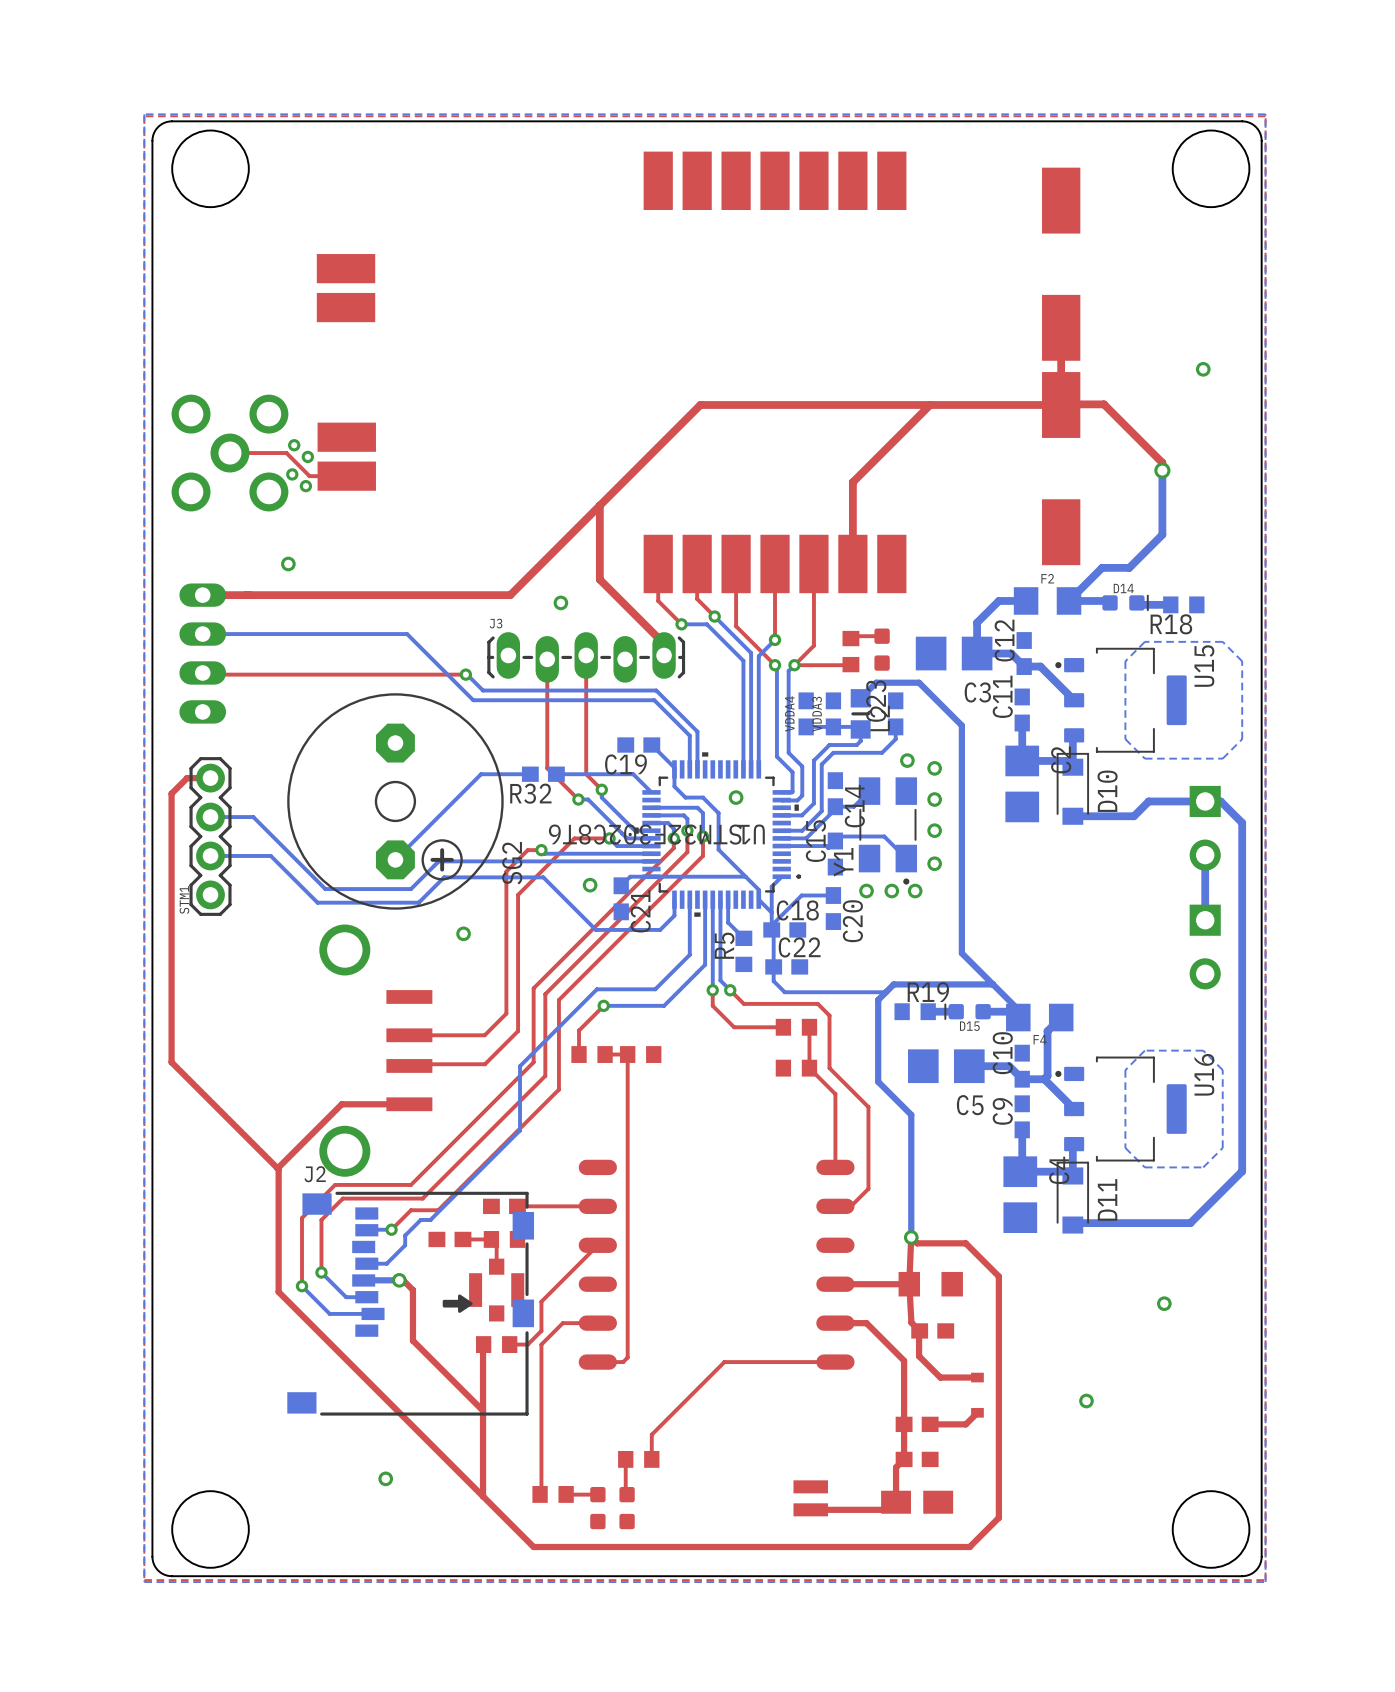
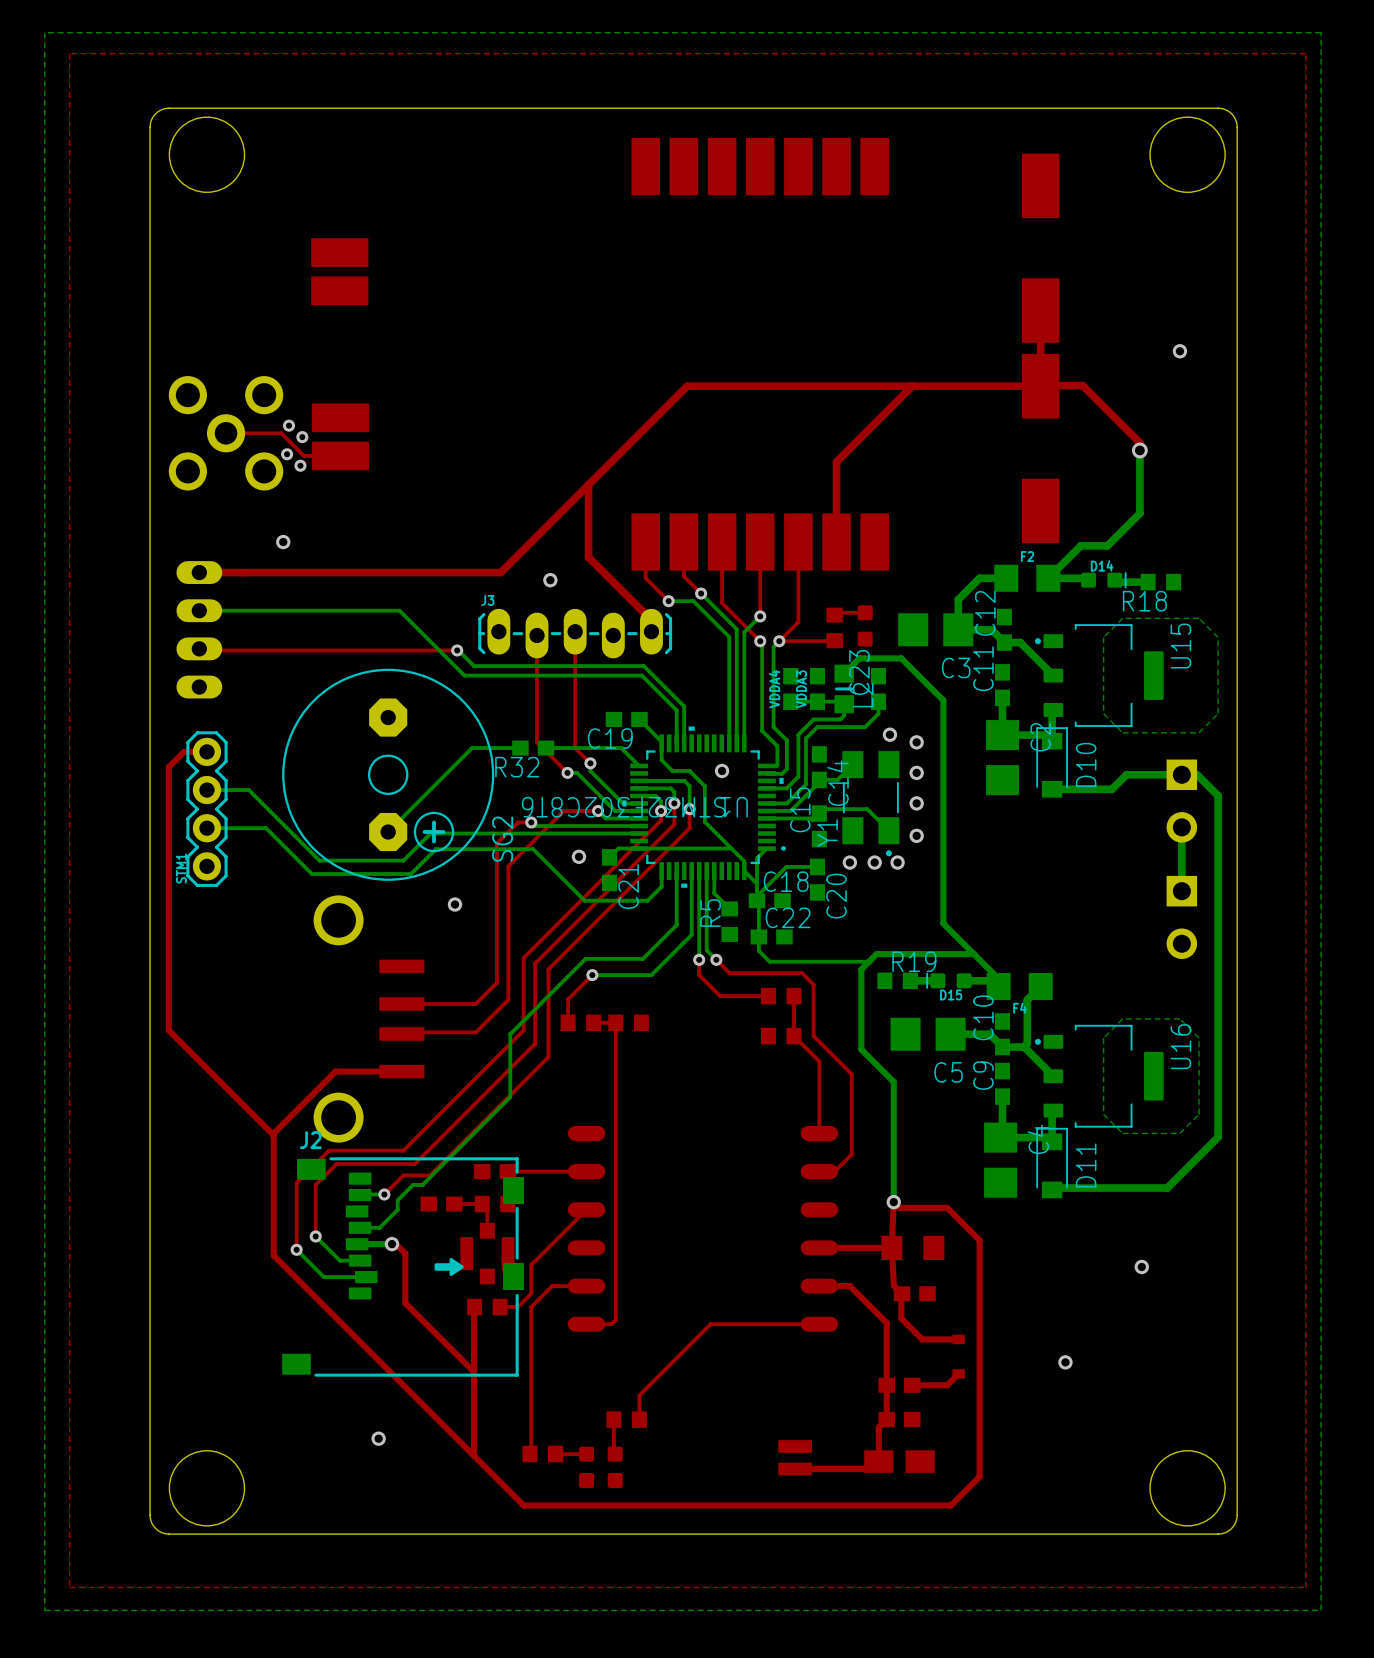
bottom zone outline: (1265, 114) (144, 114) (144, 1582) (1265, 1582) (1265, 114) -> (1321, 32) (1321, 1610) (44, 1610) (44, 32) (1321, 32)
top zone outline: (1265, 116) (144, 116) (144, 1580) (1265, 1580) (1265, 116) -> (1305, 53) (1305, 1587) (69, 1587) (69, 53) (1305, 53)

